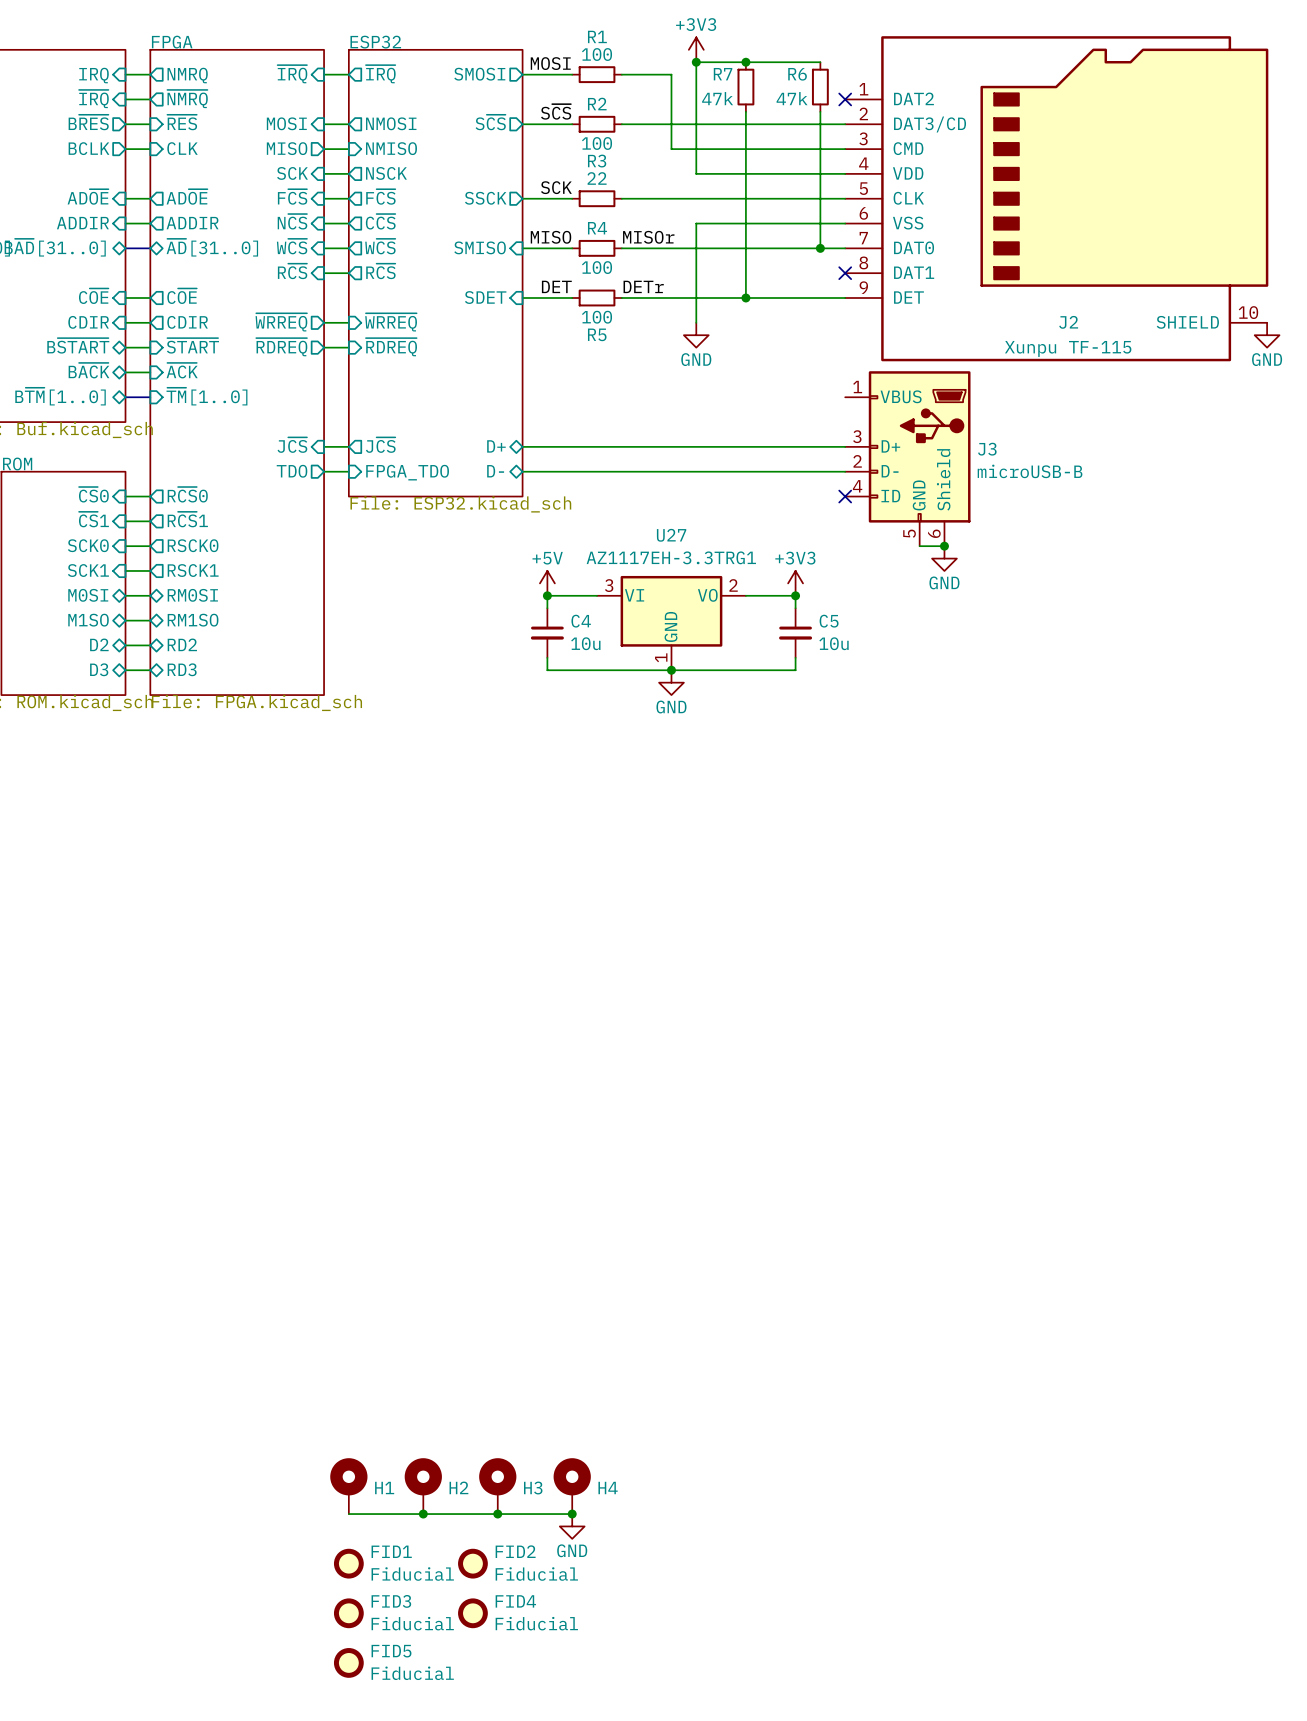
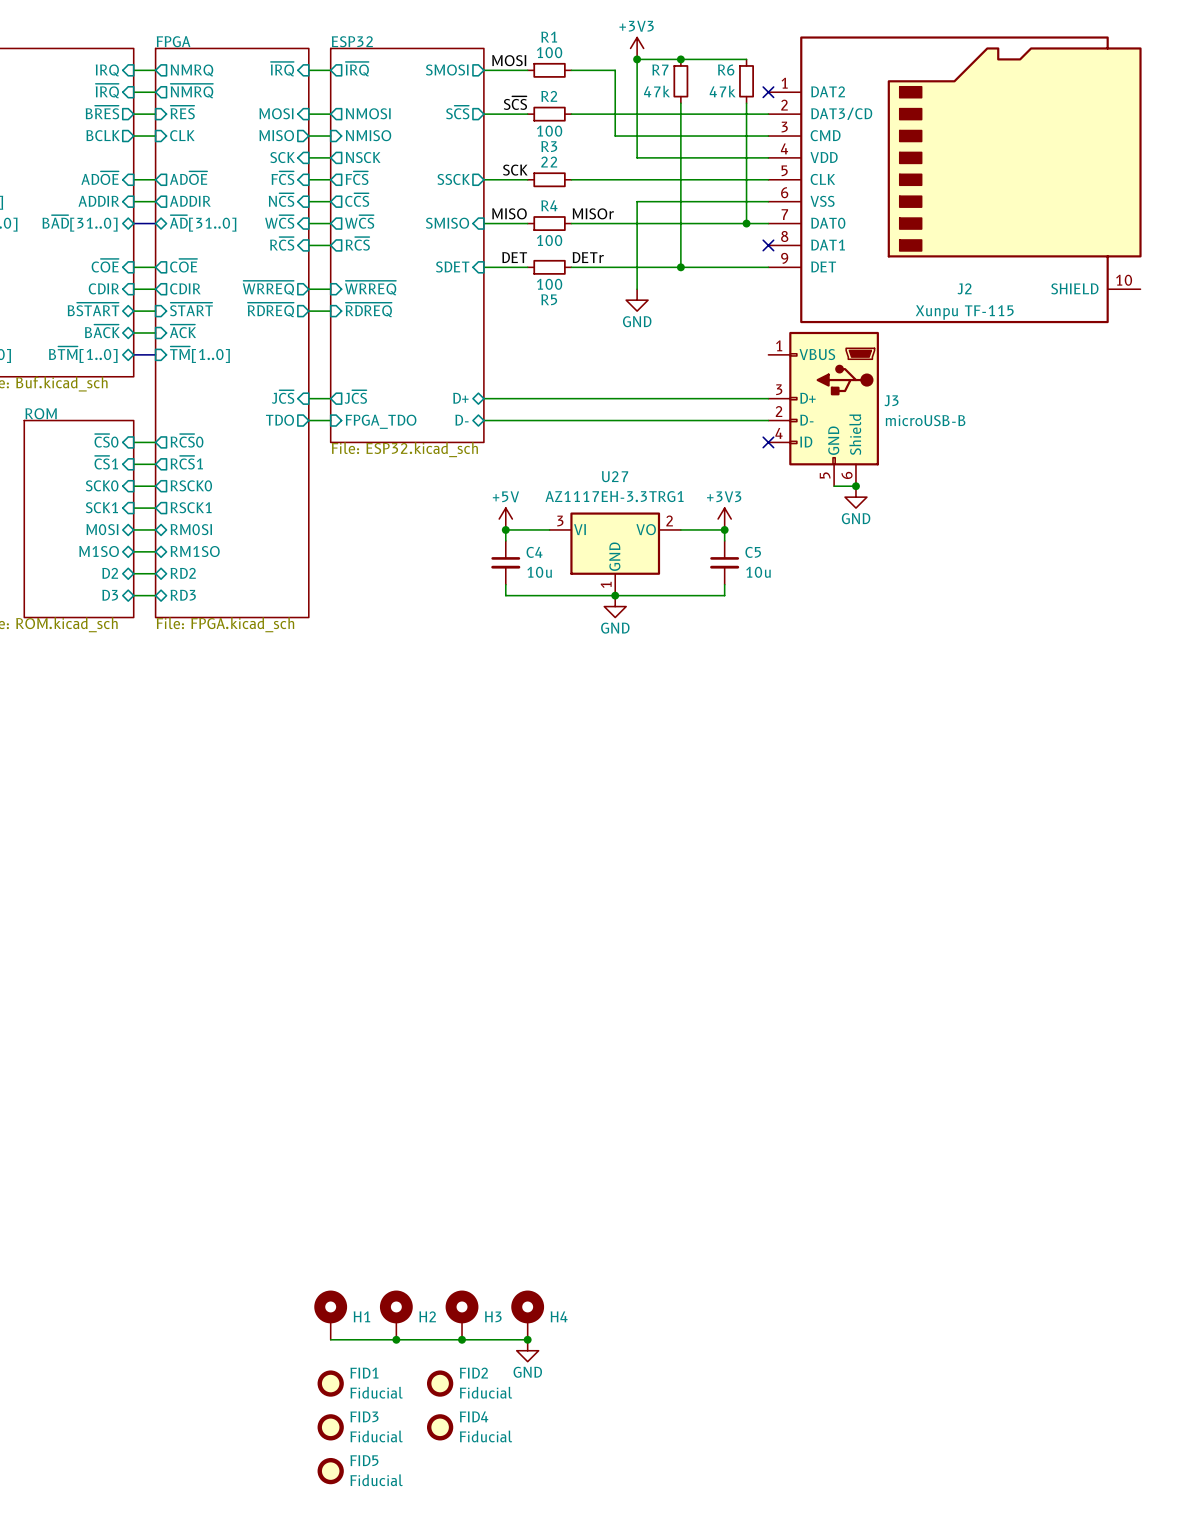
power symbol: GND (1267, 335) -> none

